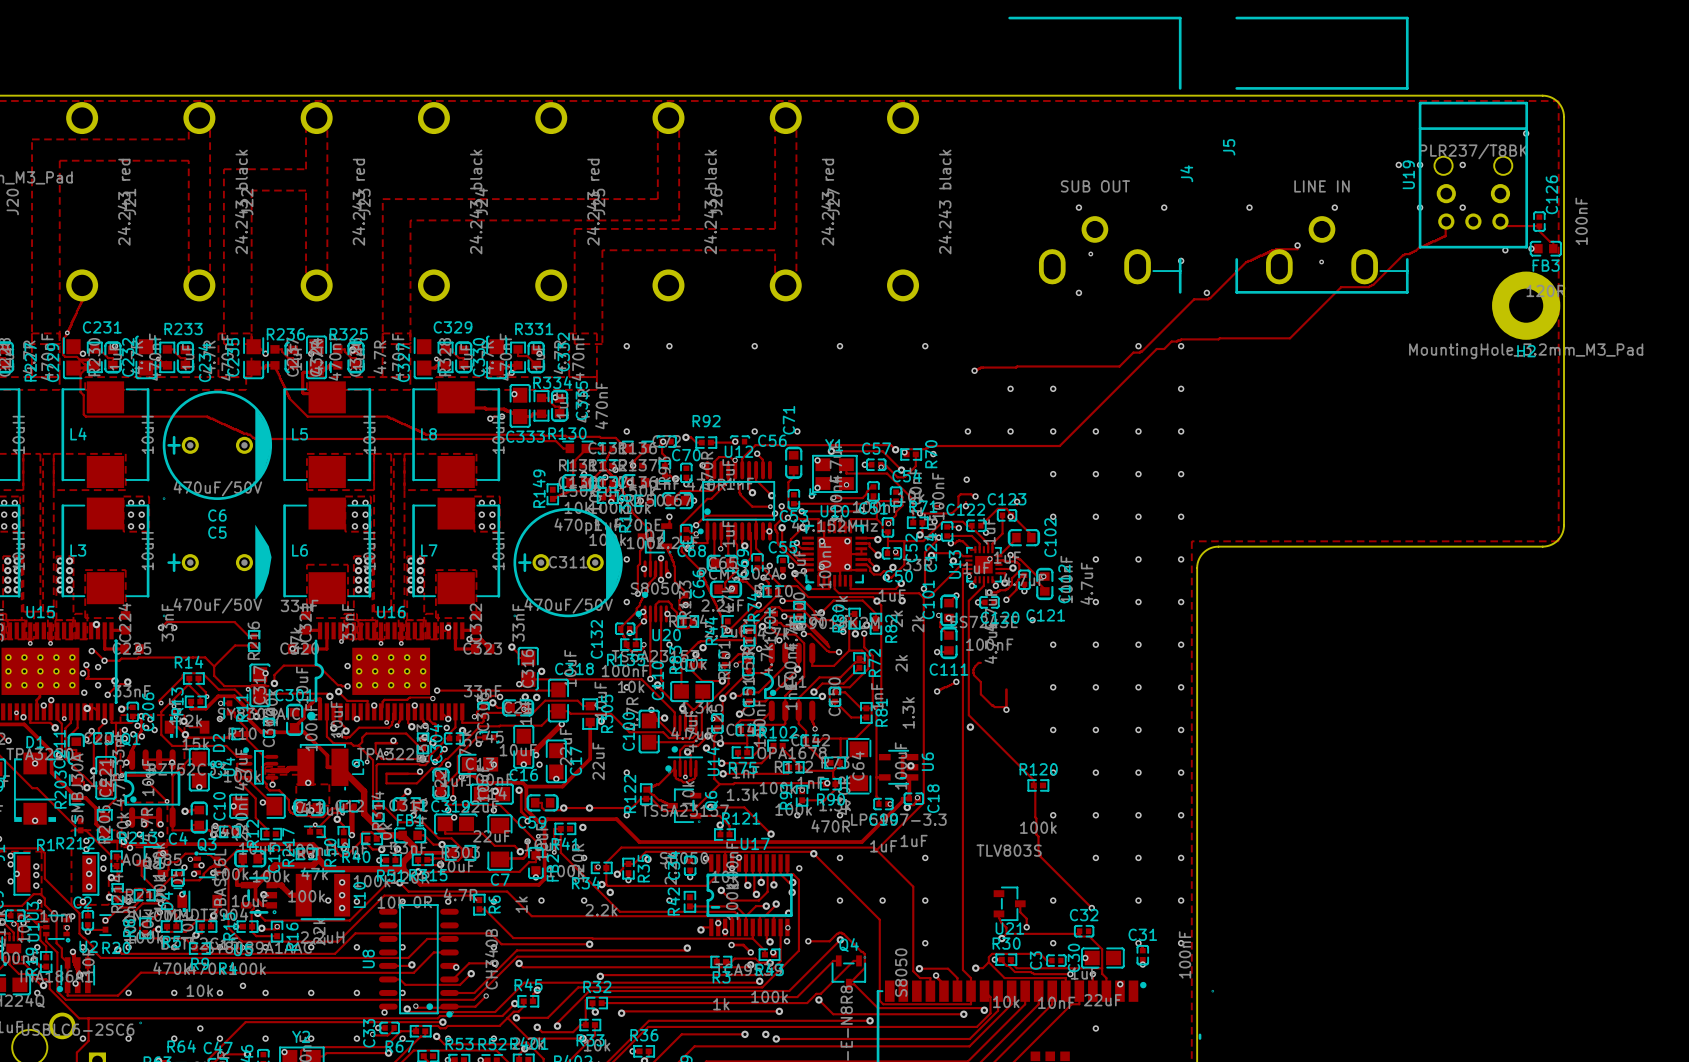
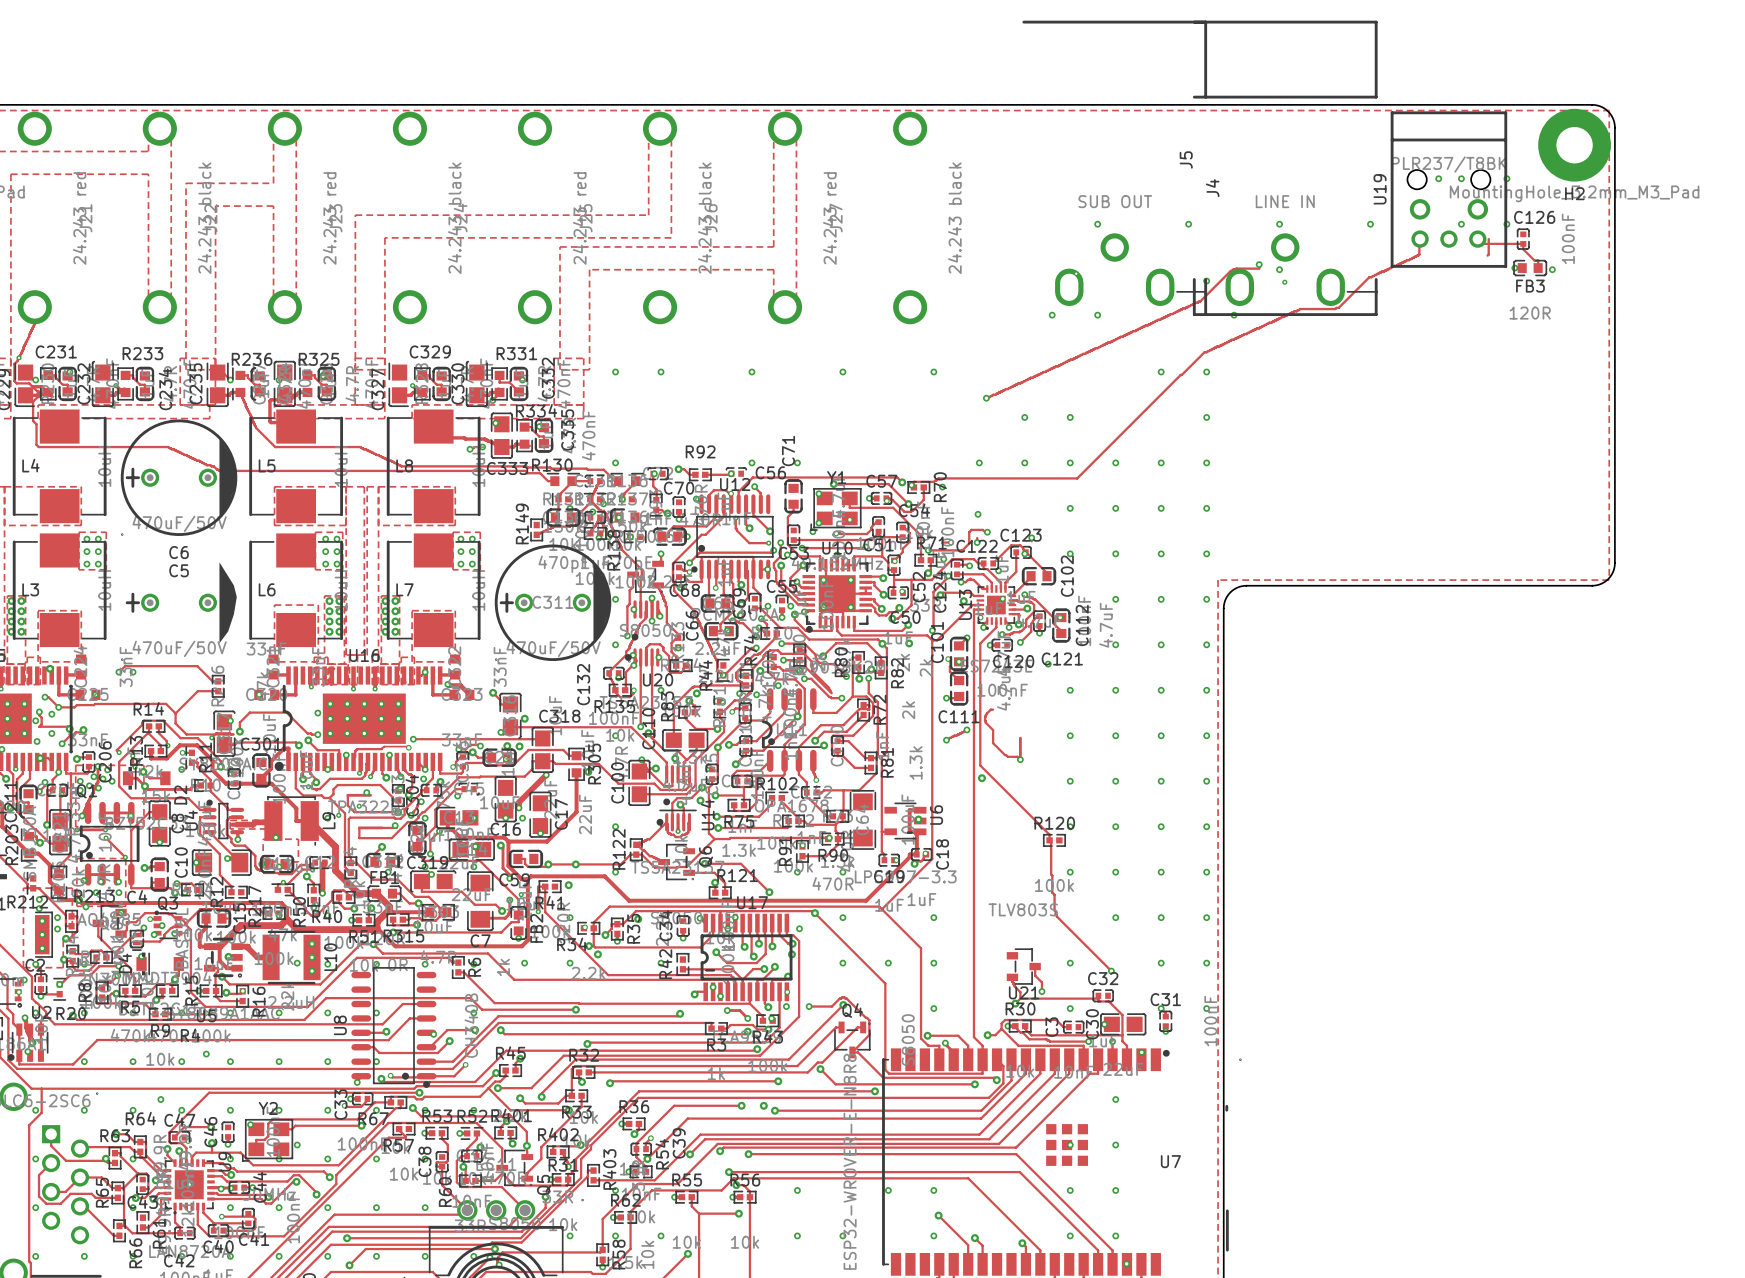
J5 position: (1322, 155) -> (1285, 168)
U19 position: (1473, 175) -> (1448, 189)
C126 name rotation: 0° (1551, 194) -> 90° clockwise (1534, 217)
track: none -> (1477, 239) (1482, 243) (1523, 243) (1523, 249) (1534, 260) (1538, 260) (1538, 268)
track: (1500, 221) (1504, 226) (1539, 226) (1539, 231) (1549, 241) (1553, 241) (1553, 248) -> none
C126 position: (1539, 221) -> (1523, 239)
track: (1445, 235) (1409, 254) (1403, 255) (1368, 287) (1341, 287) (1290, 338) (1181, 339) (1171, 341) (1164, 348) (1157, 348) -> (1419, 239) (1418, 255) (1369, 277) (1338, 307) (1300, 309) (1294, 311) (1204, 352) (1181, 374)
via: none -> (1259, 264)
track: (1297, 245) (1297, 249) (1272, 250) (1246, 262) (1210, 298) (1194, 299) (1141, 351) (1133, 352) (1119, 366) (983, 367) -> (1259, 264) (1259, 268) (1236, 268) (1230, 270) (1197, 302) (995, 394)
via: (1297, 245) -> none
via position: (1531, 248) -> (1514, 268)
FB3 position: (1545, 248) -> (1530, 268)
via: none -> (1279, 269)
via position: (1090, 254) -> (1076, 273)
via: none -> (1284, 282)
via: (1321, 262) -> none
via: none -> (1052, 315)
H2 position: (1526, 305) -> (1574, 145)

